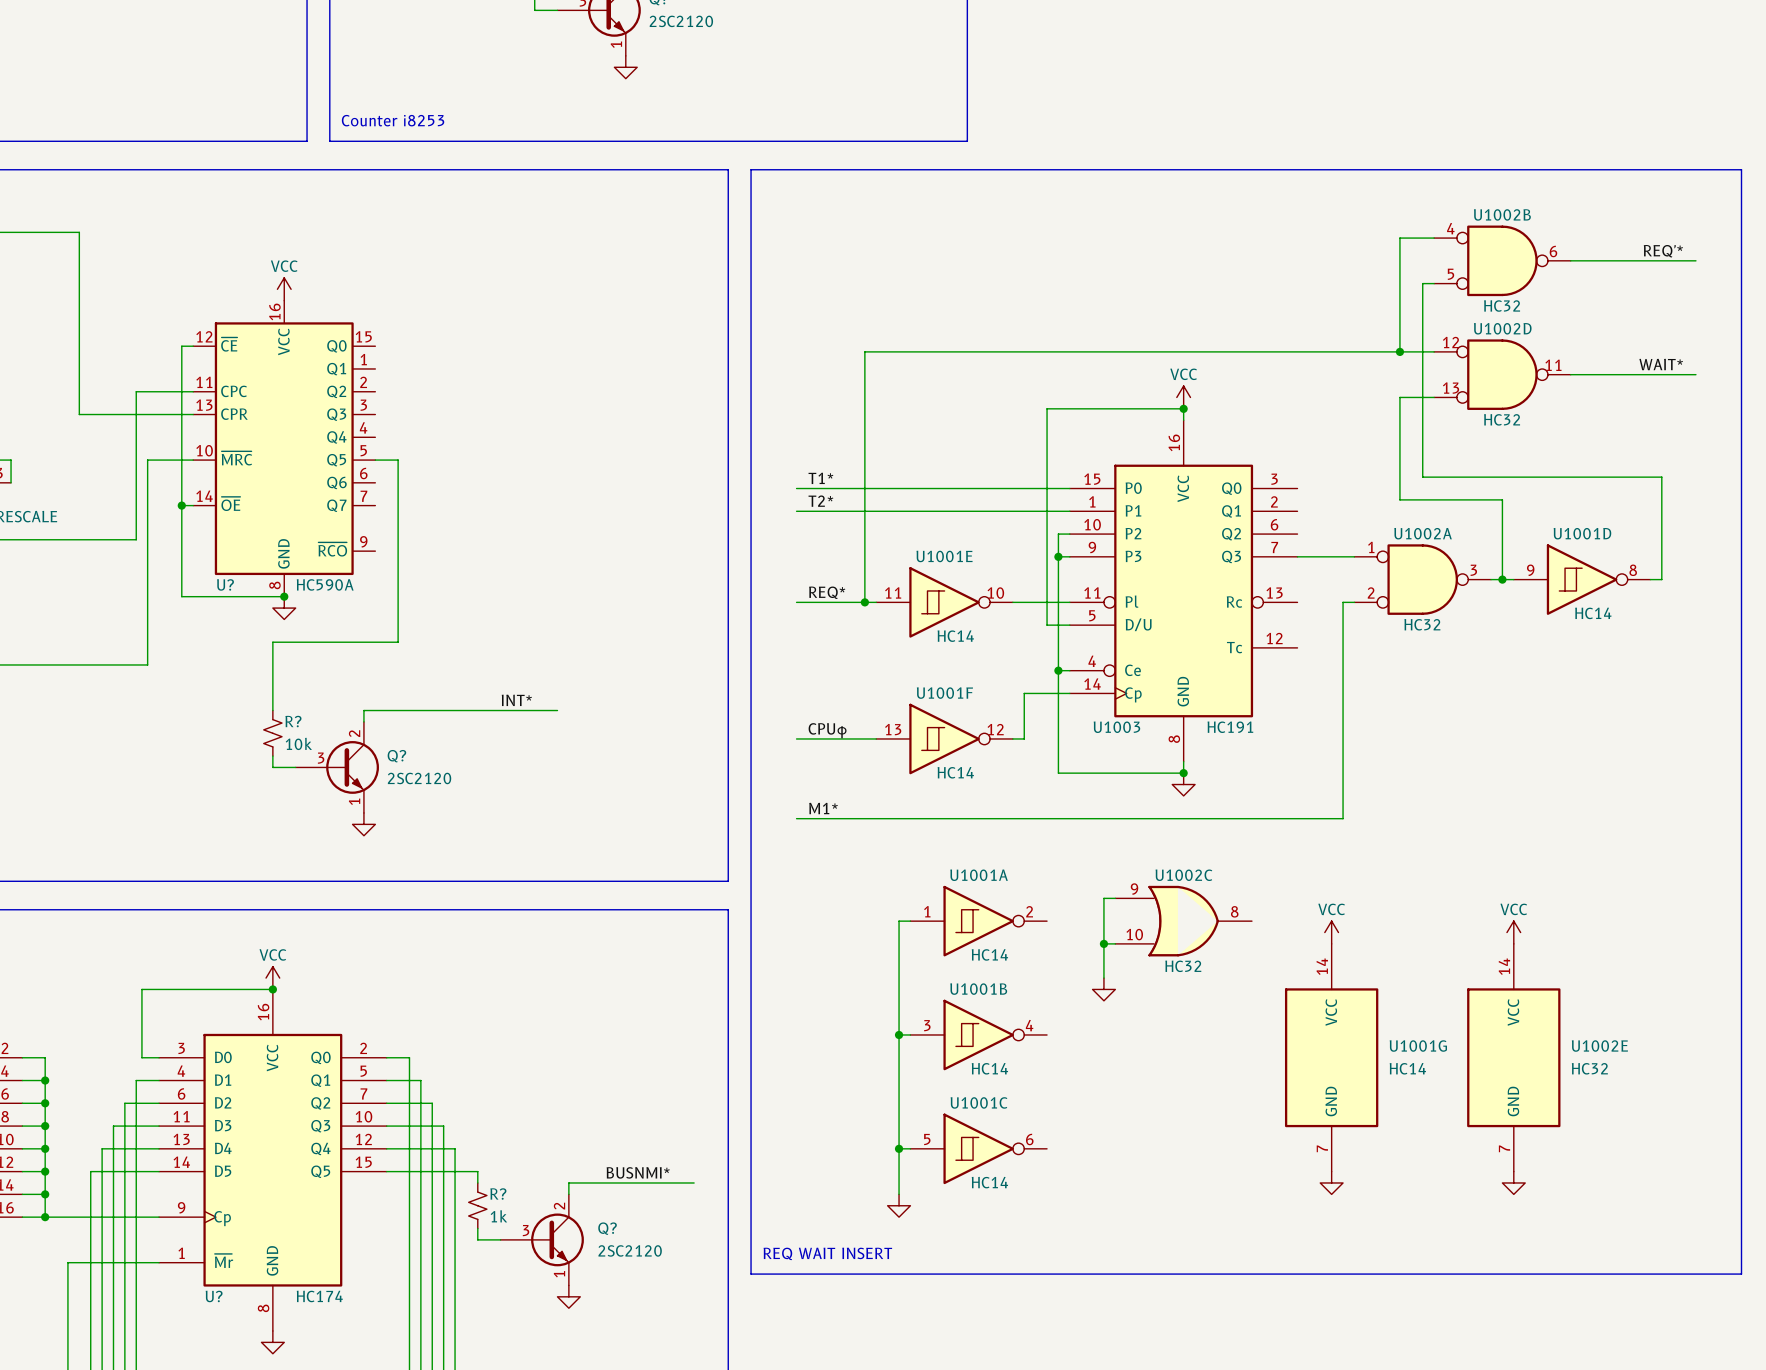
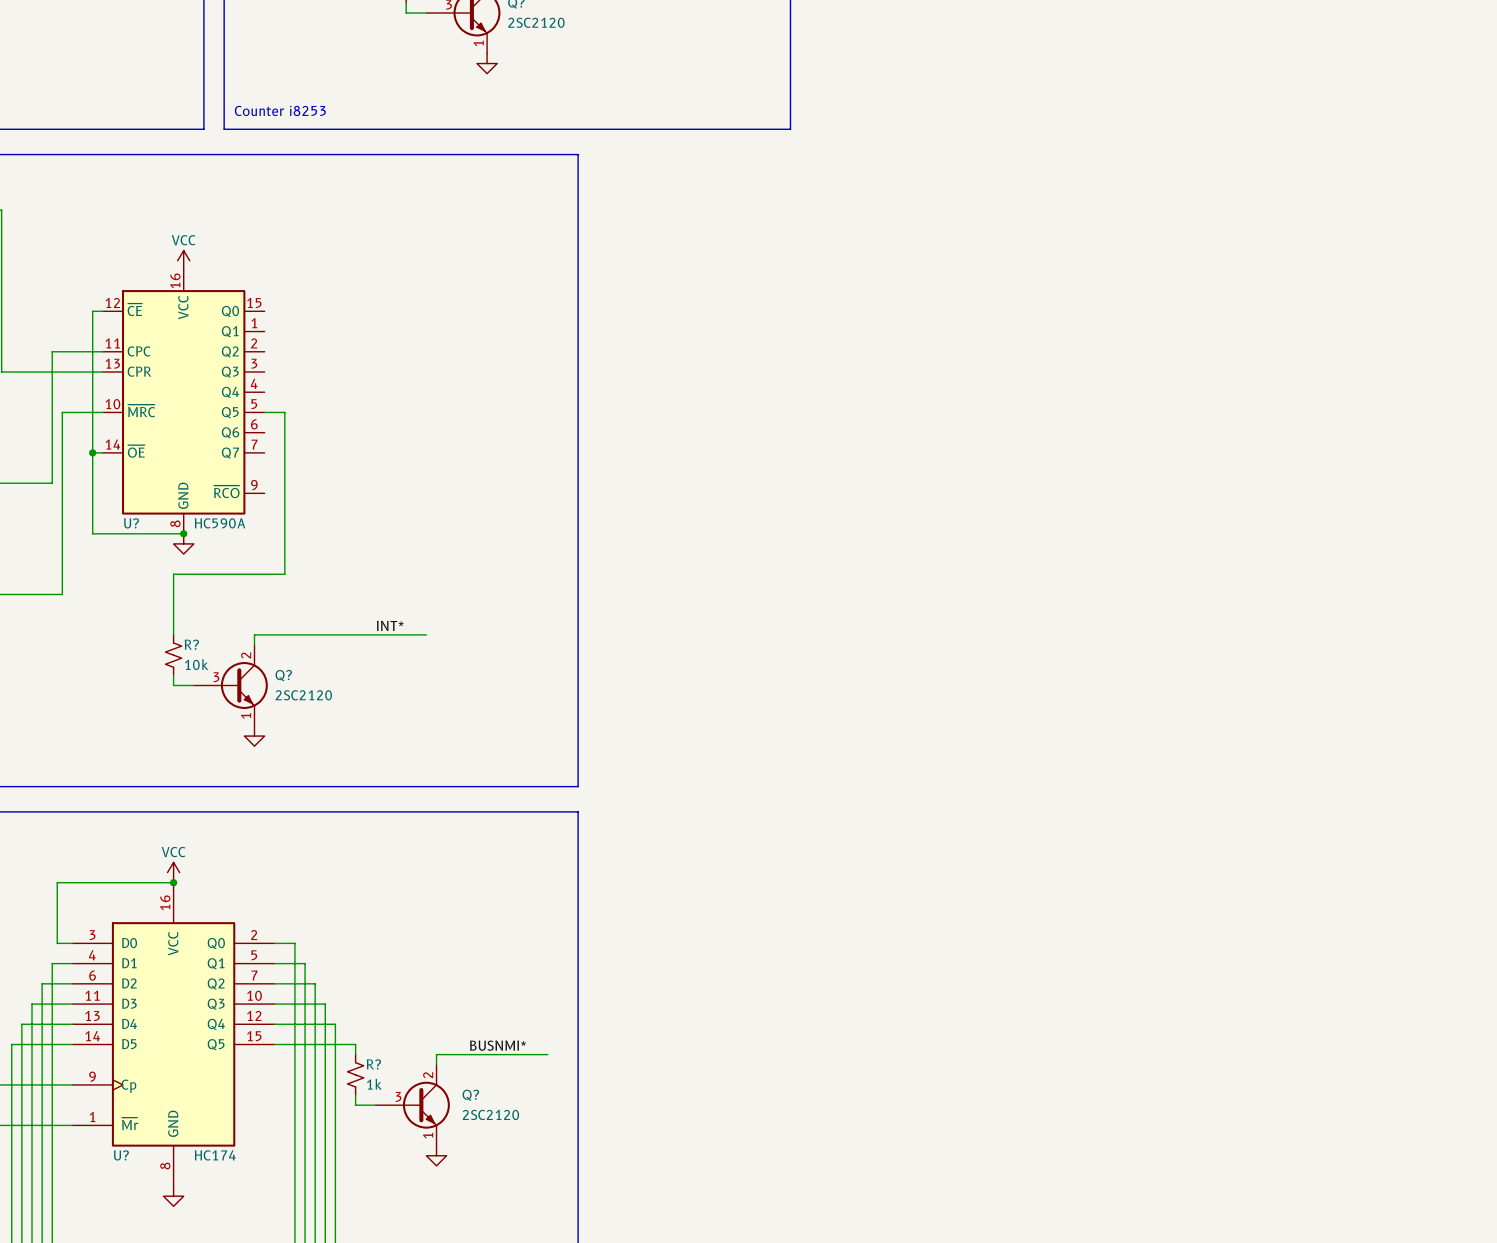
line: (751, 169) (751, 1274) (1741, 1274) (1741, 169) (751, 169) -> none
wire: (1434, 238) (1399, 238) (1399, 351) -> none
label: REQ'* (1663, 251) -> none
U1002B: HC32 (1502, 260) -> none
wire: (1570, 260) (1695, 260) -> none
wire: (1434, 283) (1422, 283) (1422, 477) (1661, 477) (1661, 579) (1650, 579) -> none
junction: (1399, 351) -> none
wire: (1434, 351) (864, 351) (864, 602) -> none
label: WAIT* (1661, 364) -> none
U1002D: HC32 (1502, 374) -> none
wire: (1570, 374) (1695, 374) -> none
power symbol: VCC (1183, 397) -> none
wire: (1434, 397) (1399, 397) (1399, 499) (1502, 499) (1502, 579) -> none
junction: (1183, 408) -> none
wire: (1183, 420) (1183, 408) (1047, 408) (1047, 625) (1069, 625) -> none
label: T1* (820, 478) -> none
wire: (796, 488) (1069, 488) -> none
label: T2* (820, 501) -> none
wire: (796, 511) (1069, 511) -> none
wire: (1069, 534) (1058, 534) (1058, 773) (1183, 773) (1183, 761) -> none
wire: (1058, 556) (1069, 556) -> none
junction: (1058, 556) -> none
wire: (1297, 556) (1354, 556) -> none
U1002A: HC32 (1422, 579) -> none
wire: (1491, 579) (1513, 579) -> none
junction: (1502, 579) -> none
U1001D: HC14 (1582, 579) -> none
U1003: HC191 (1183, 590) -> none
label: REQ* (827, 592) -> none
wire: (796, 602) (876, 602) -> none
junction: (864, 602) -> none
U1001E: HC14 (944, 602) -> none
wire: (1012, 602) (1069, 602) -> none
wire: (1354, 602) (1343, 602) (1343, 818) (796, 818) -> none
wire: (1058, 670) (1069, 670) -> none
junction: (1058, 670) -> none
wire: (1069, 693) (1024, 693) (1024, 738) (1012, 738) -> none
label: CPUφ (827, 730) -> none
wire: (796, 738) (876, 738) -> none
U1001F: HC14 (944, 738) -> none
junction: (1183, 773) -> none
power symbol: (1183, 784) -> none
label: M1* (823, 808) -> none
wire: (1115, 898) (1103, 898) (1103, 978) -> none
wire: (910, 921) (899, 921) (899, 1194) -> none
U1001A: HC14 (978, 921) -> none
U1002C: HC32 (1183, 921) -> none
power symbol: VCC (1331, 932) -> none
power symbol: VCC (1513, 932) -> none
wire: (1103, 943) (1115, 943) -> none
junction: (1103, 943) -> none
power symbol: (1103, 989) -> none
wire: (899, 1034) (910, 1034) -> none
junction: (899, 1034) -> none
U1001B: HC14 (978, 1034) -> none
U1001G: HC14 (1331, 1057) -> none
U1002E: HC32 (1513, 1057) -> none
wire: (899, 1148) (910, 1148) -> none
junction: (899, 1148) -> none
U1001C: HC14 (978, 1148) -> none
power symbol: (1331, 1182) -> none
power symbol: (1513, 1182) -> none
power symbol: (899, 1205) -> none
text: REQ WAIT INSERT (827, 1253) -> none

